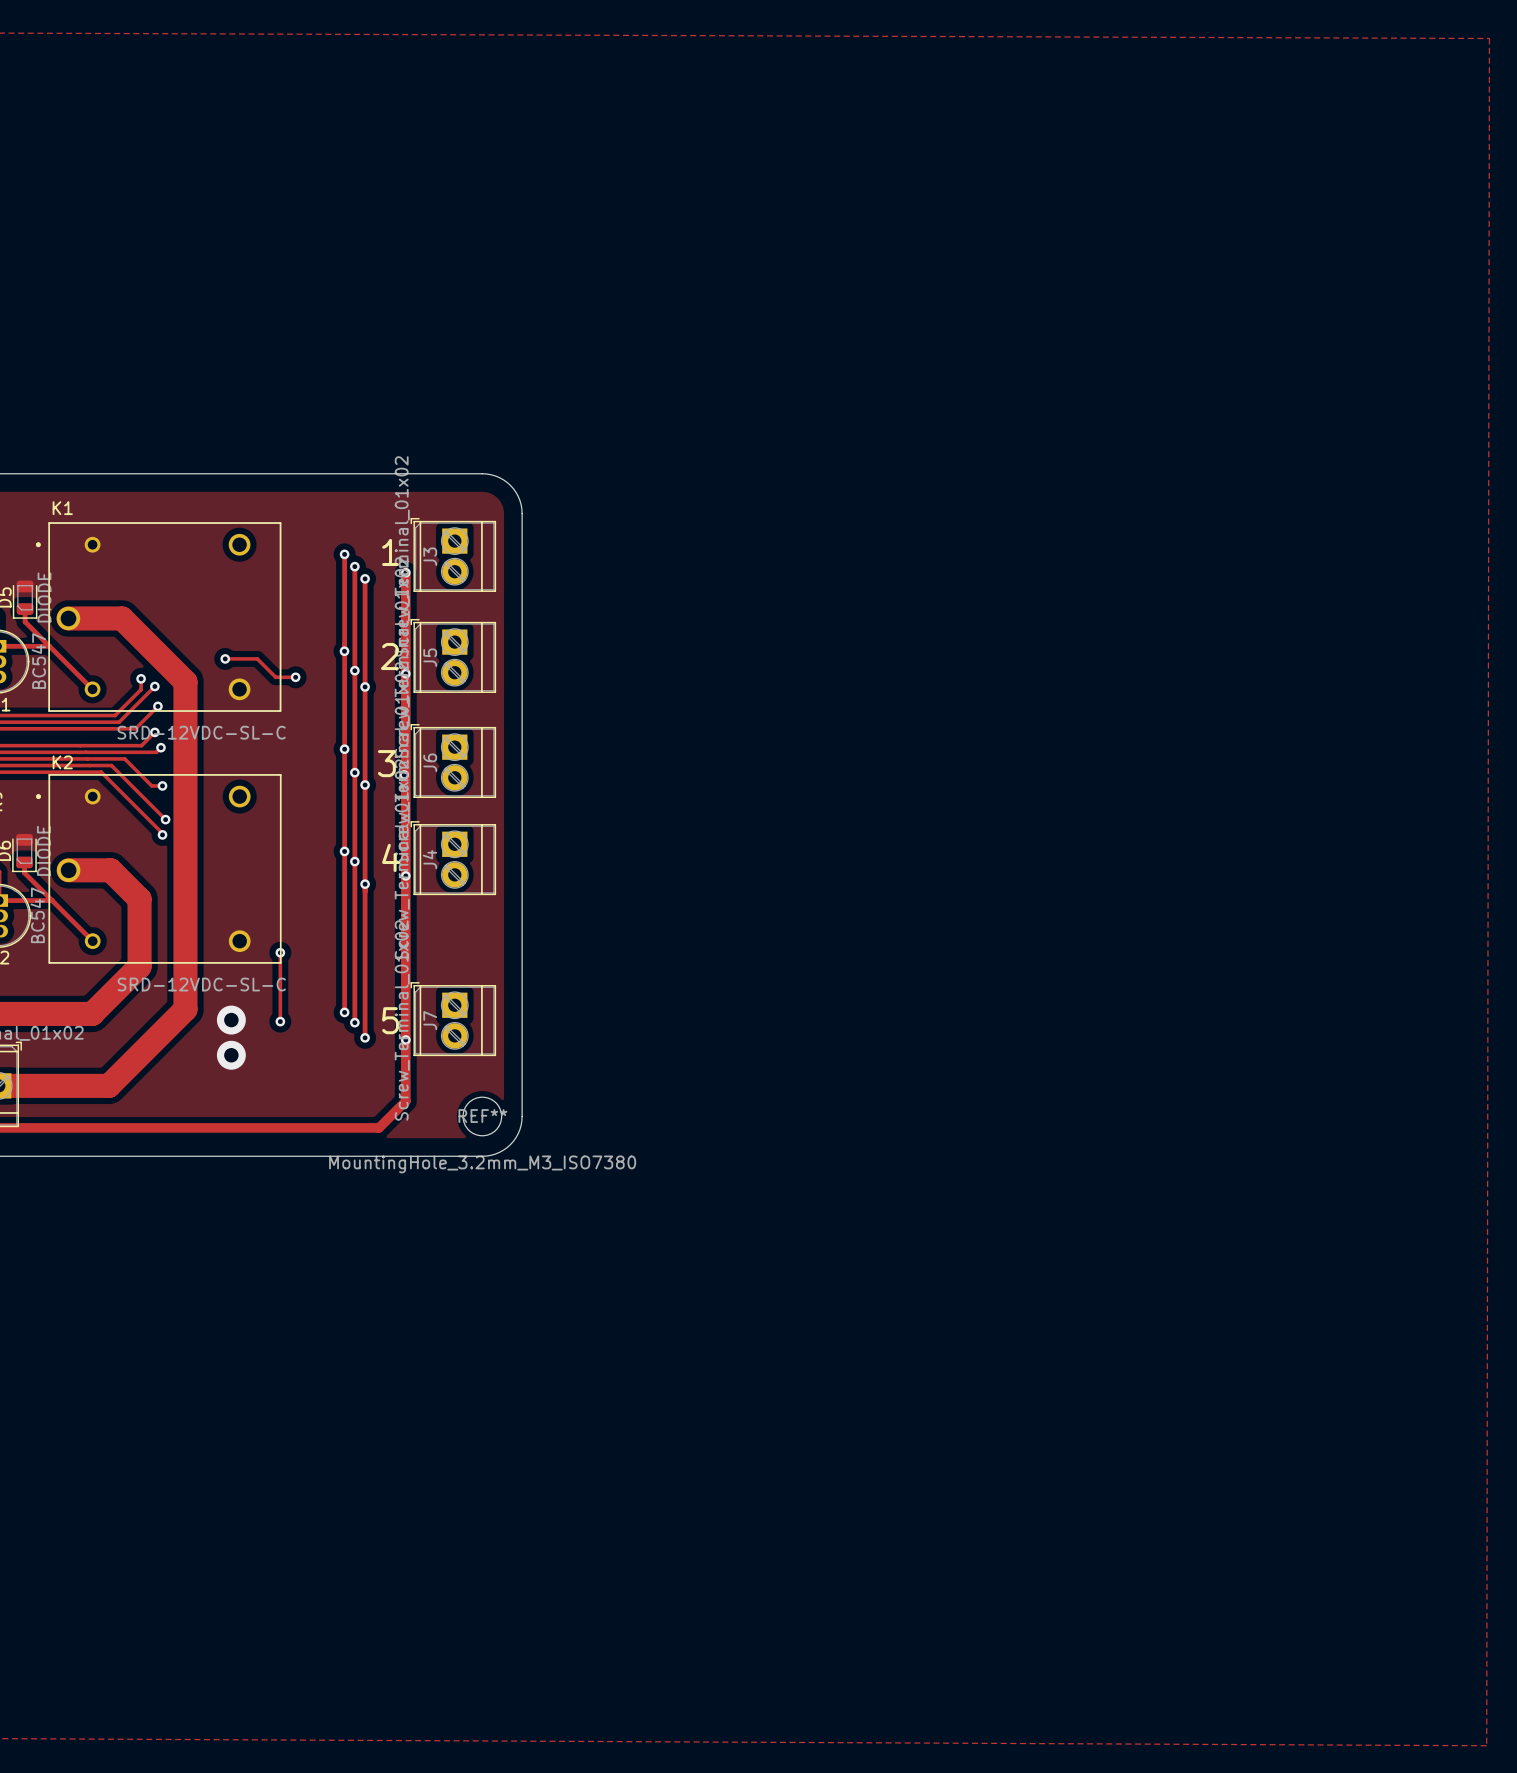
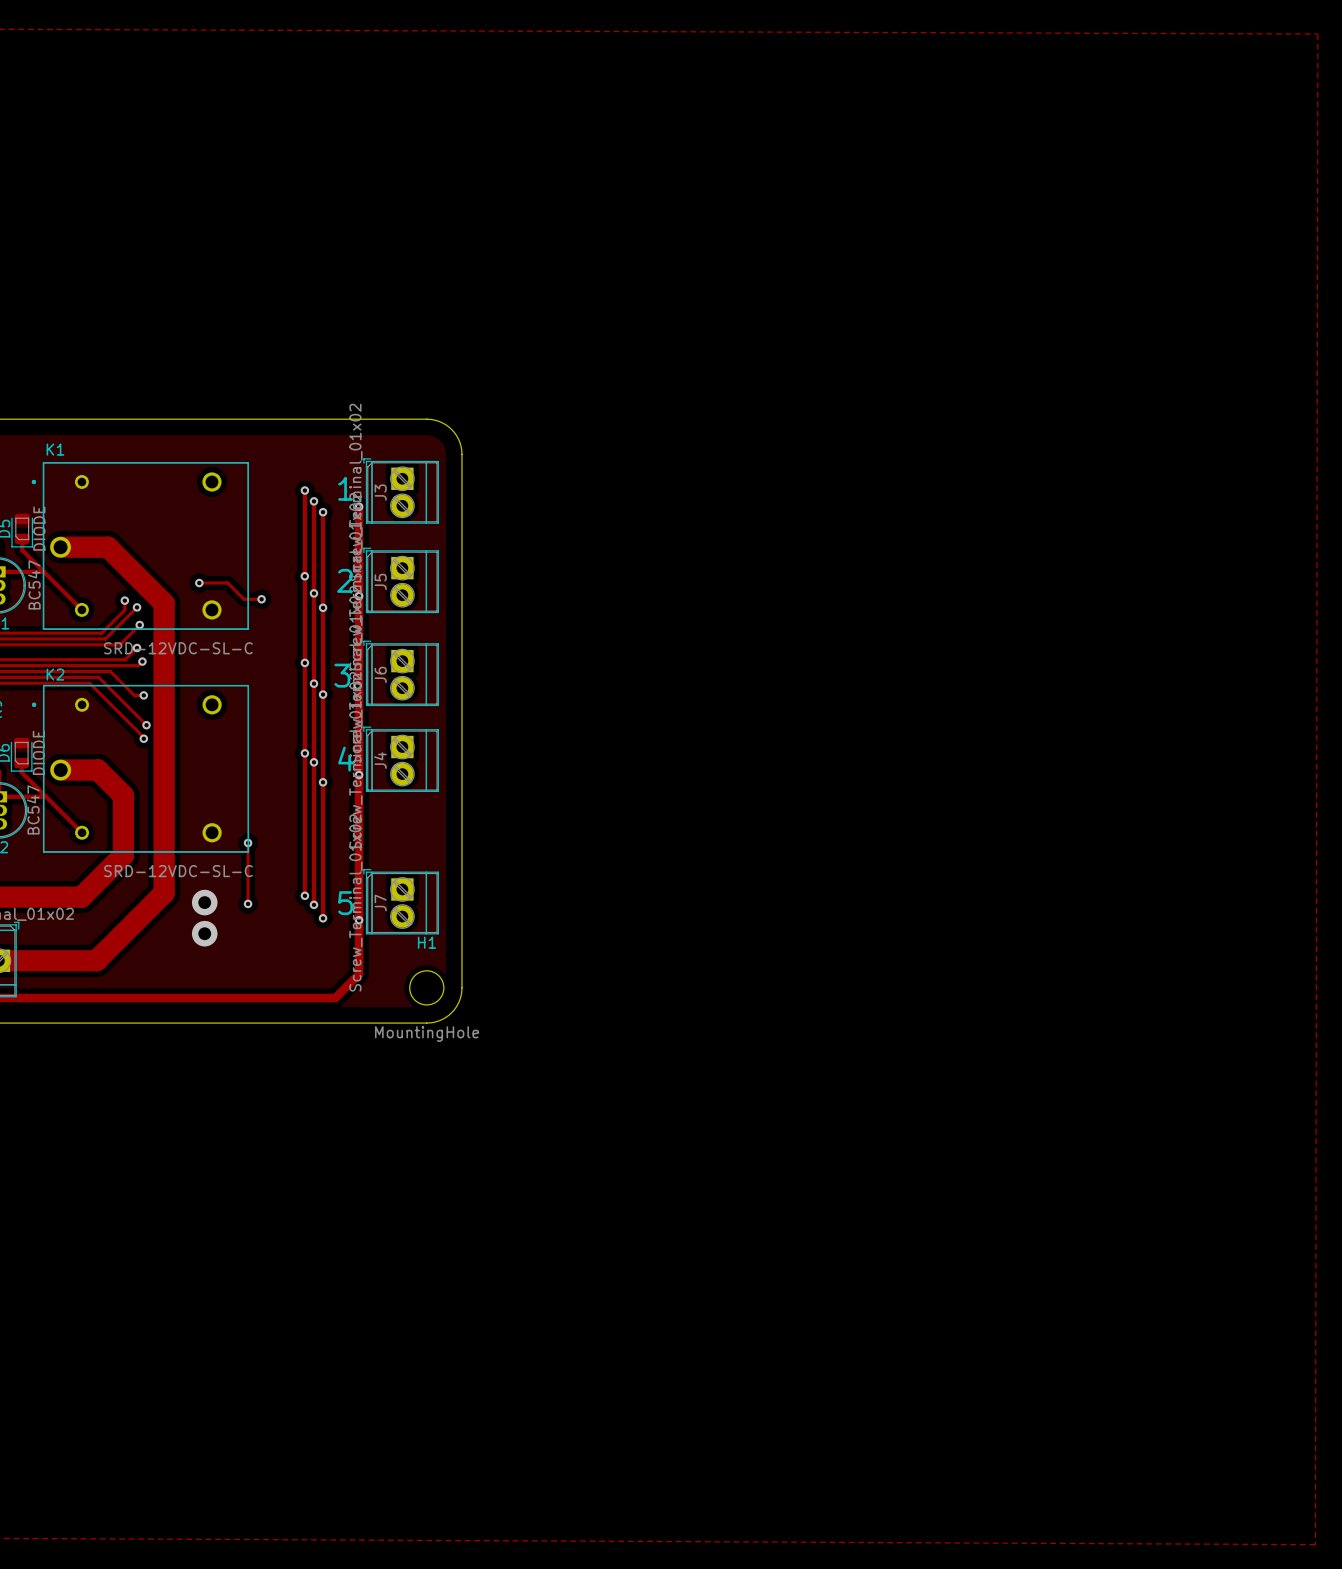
REF** name: REF** (482, 1116) -> H1 (427, 942)
REF** value: MountingHole_3.2mm_M3_ISO7380 (482, 1164) -> MountingHole (427, 1034)

